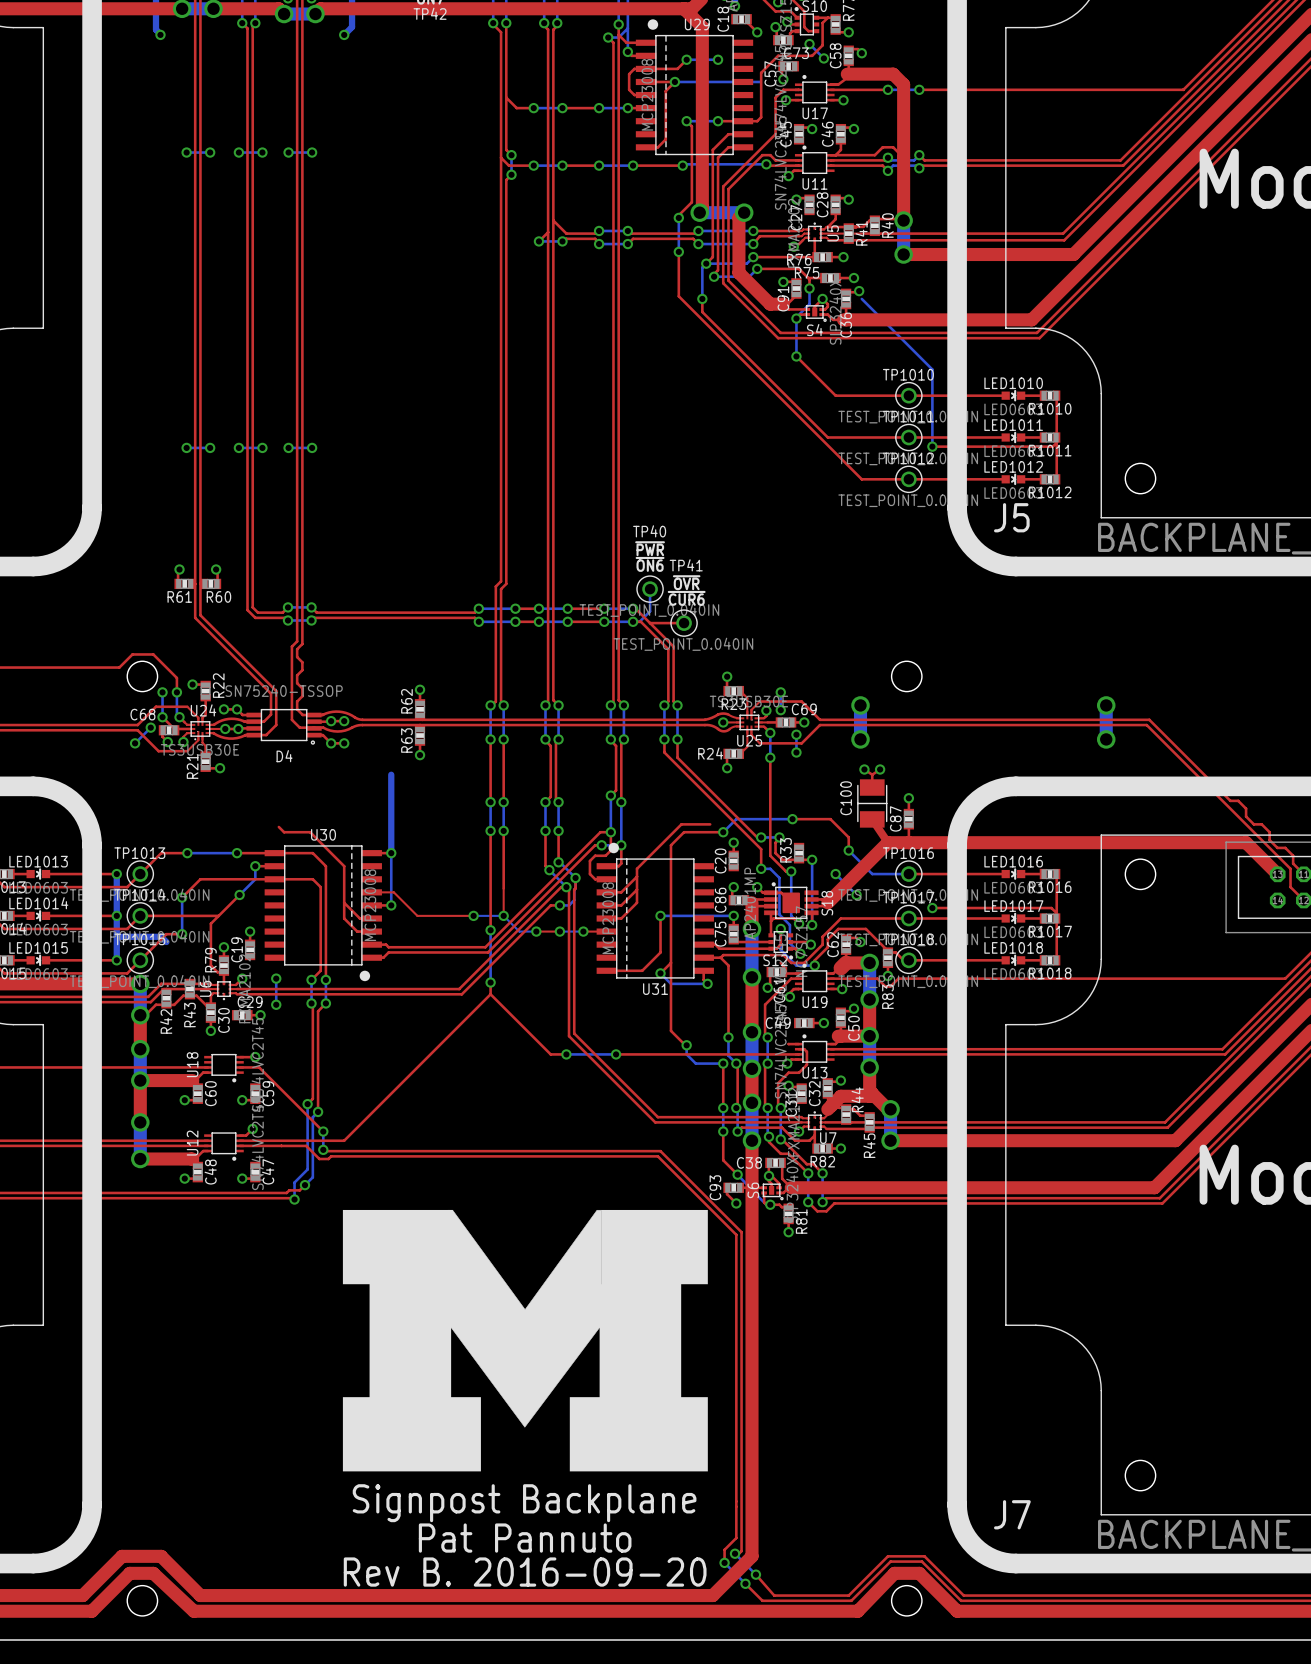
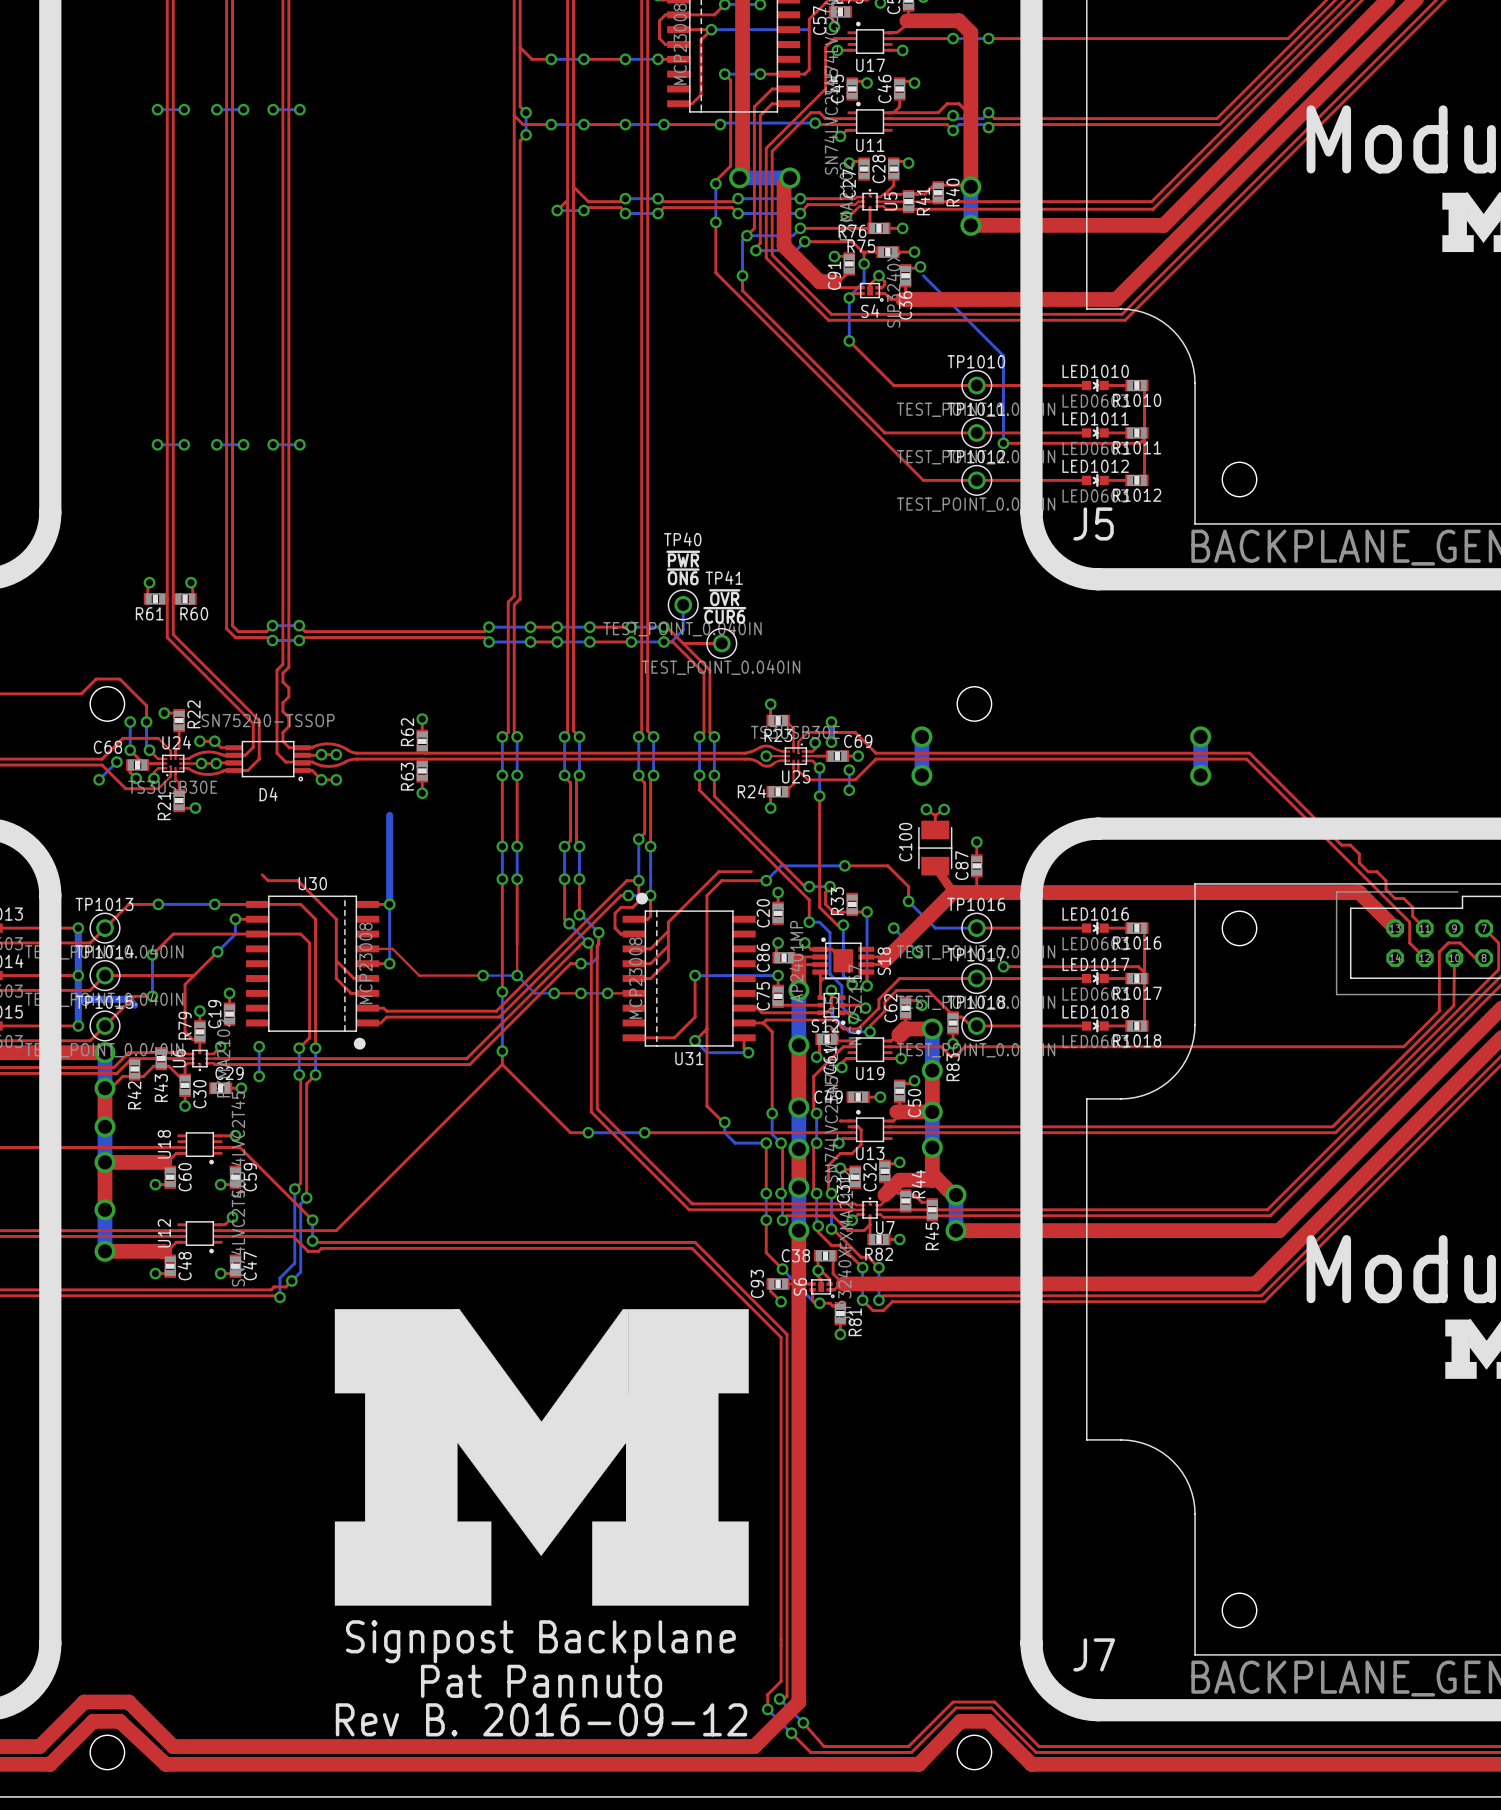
text: Rev B. 2016-09-20 (525, 1572) -> Rev B. 2016-09-12 (541, 1719)

